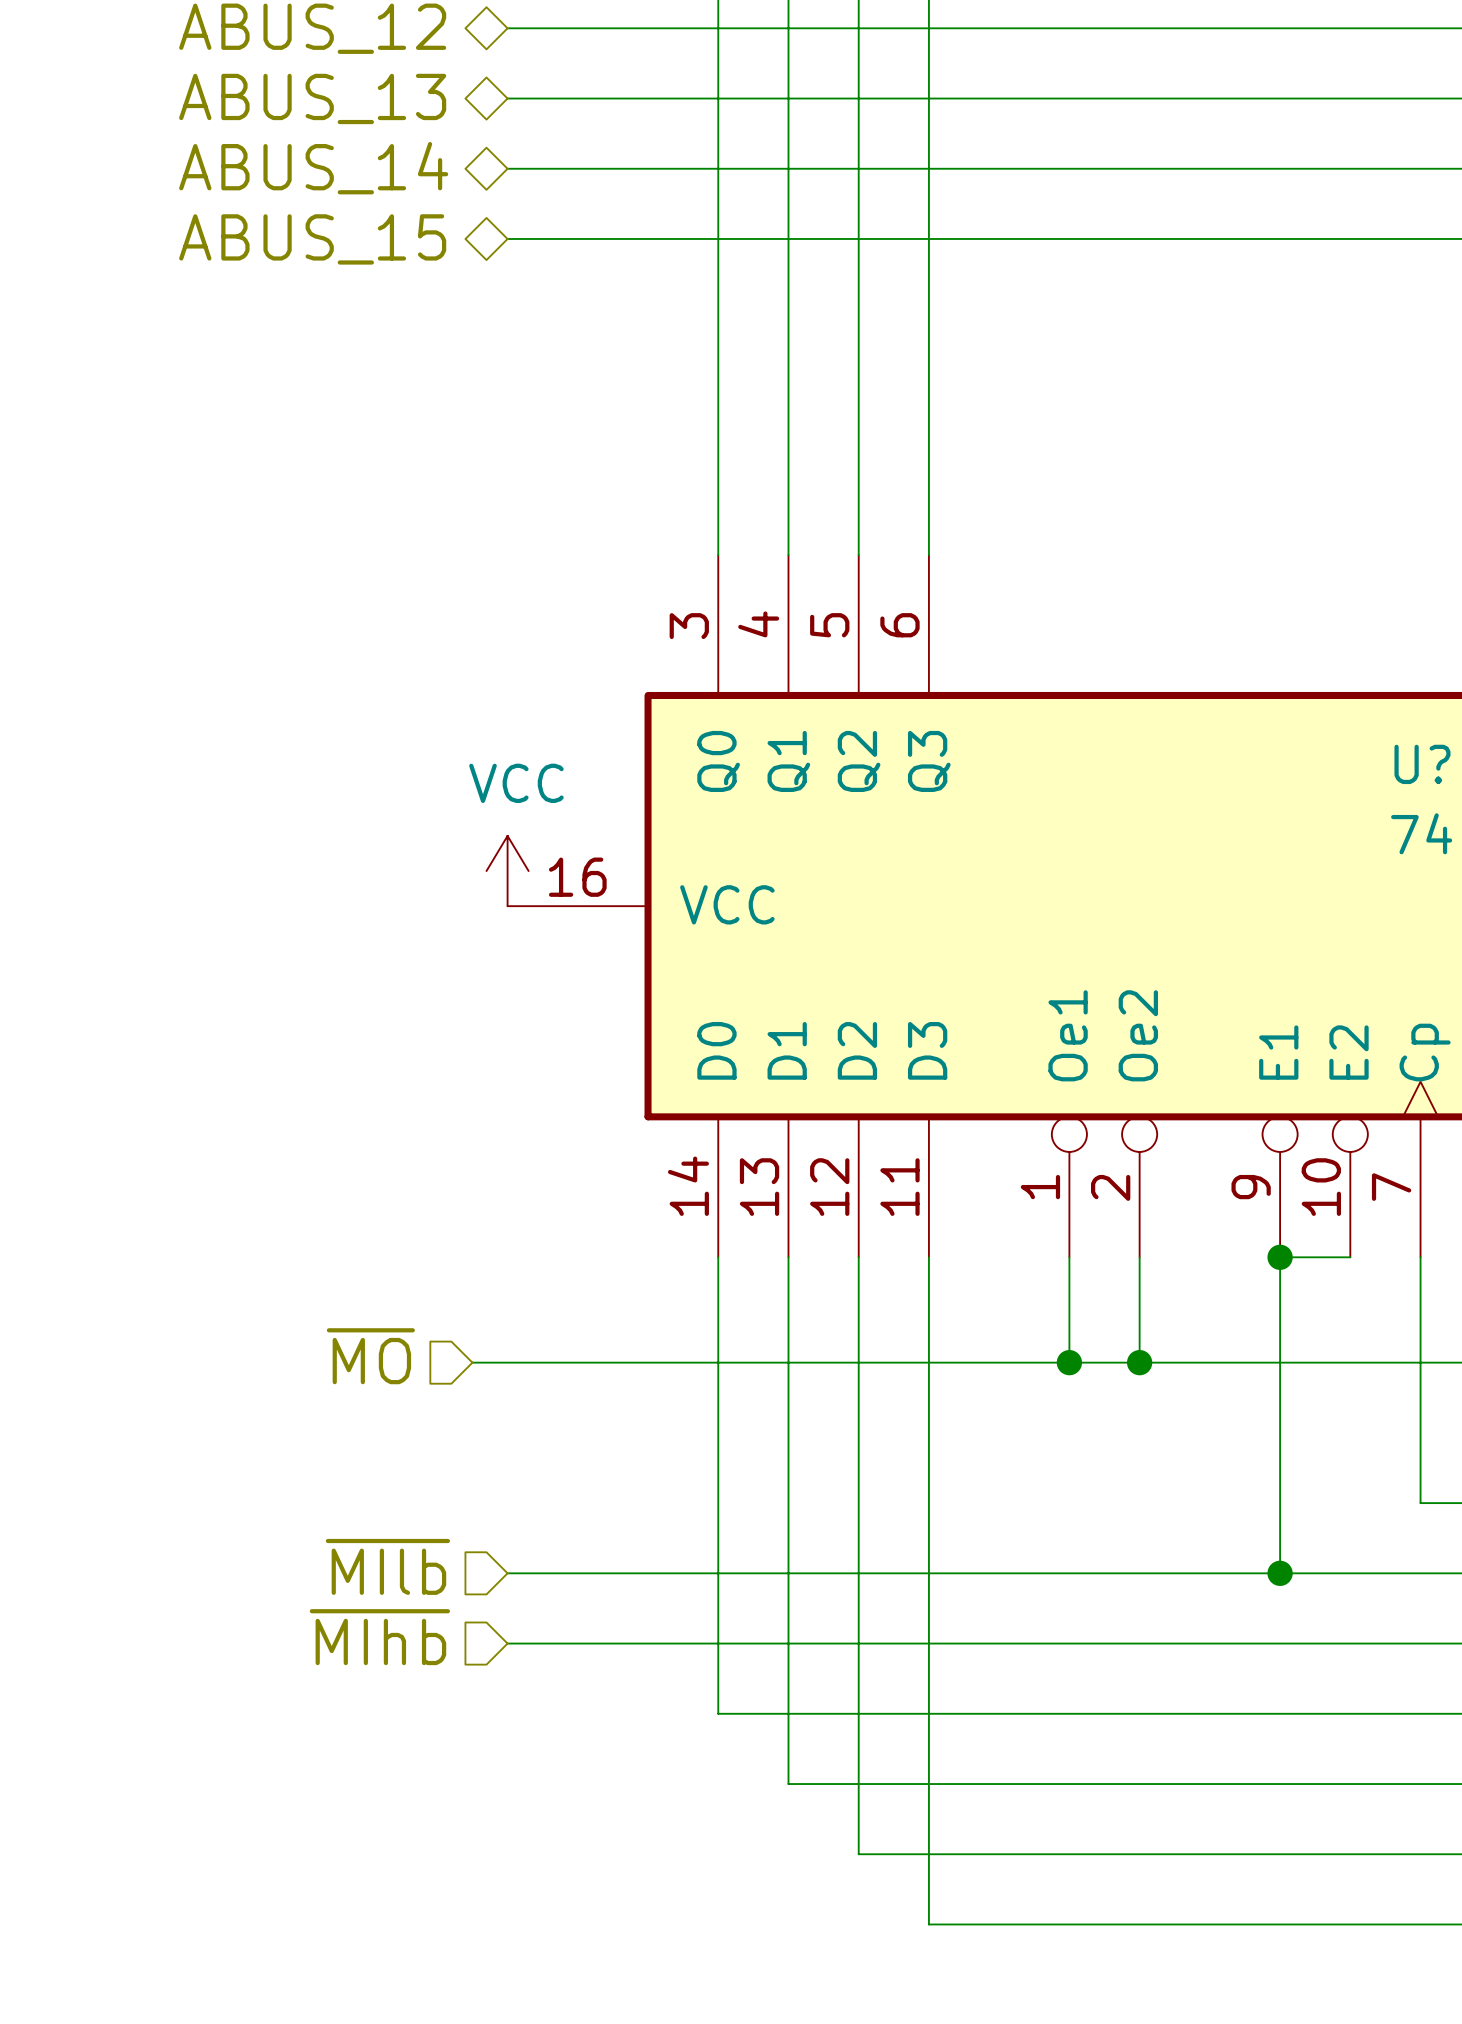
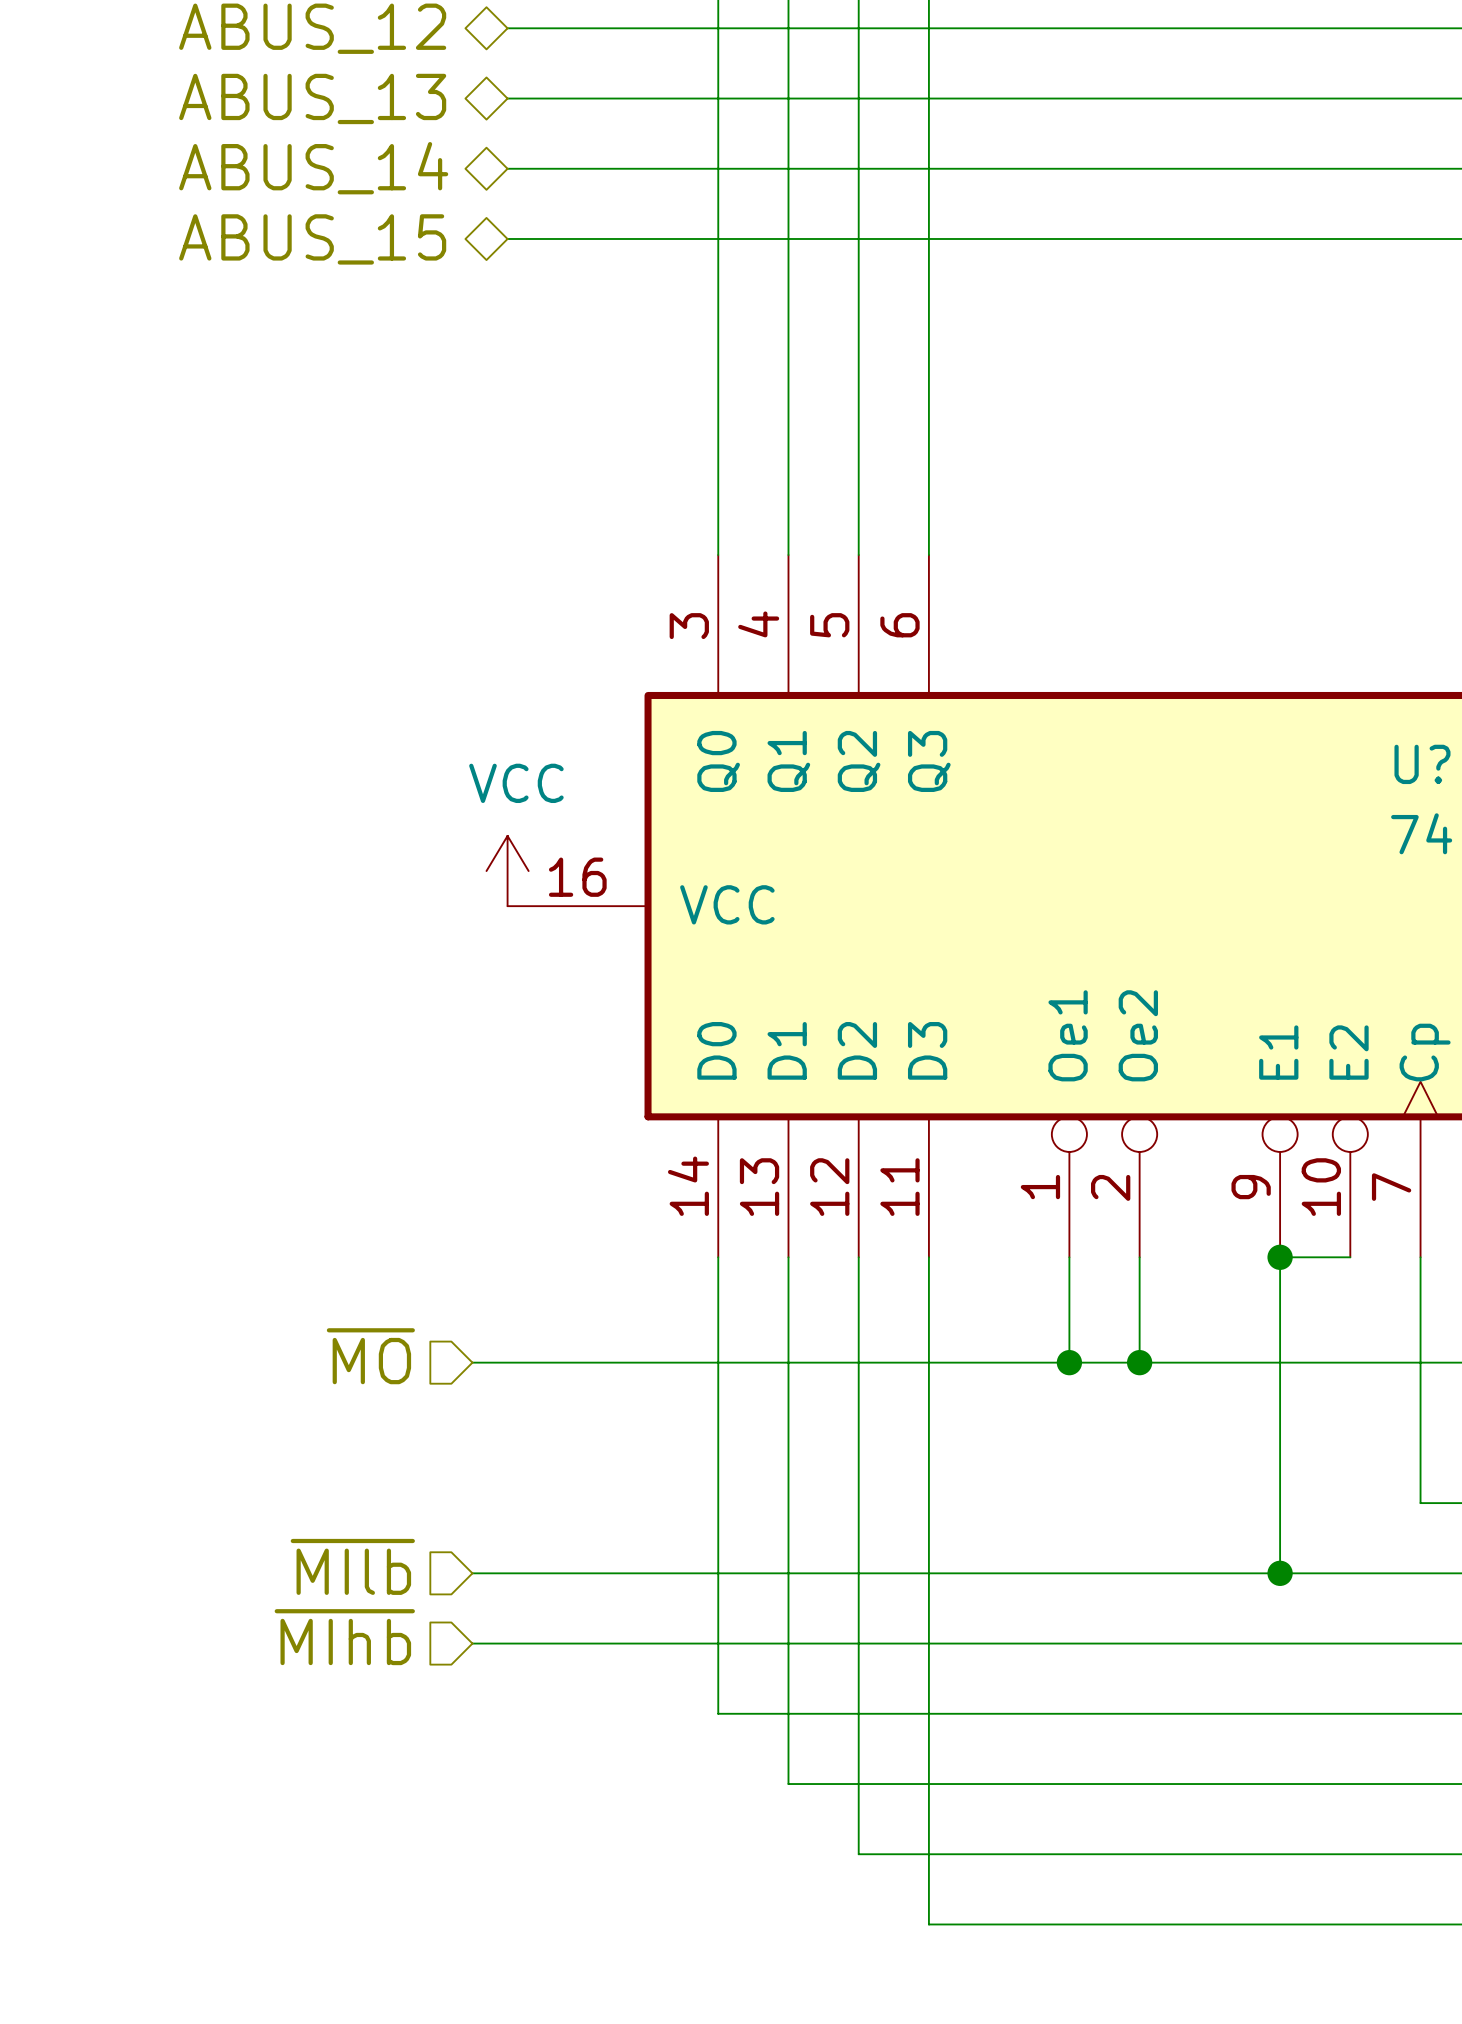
hierarchical label position: ~{MIlb} (387, 1566) -> ~{MIlb} (352, 1566)
wire: none -> (472, 1573) (507, 1573)
hierarchical label position: ~{MIhb} (379, 1637) -> ~{MIhb} (344, 1637)
wire: none -> (472, 1643) (507, 1643)

